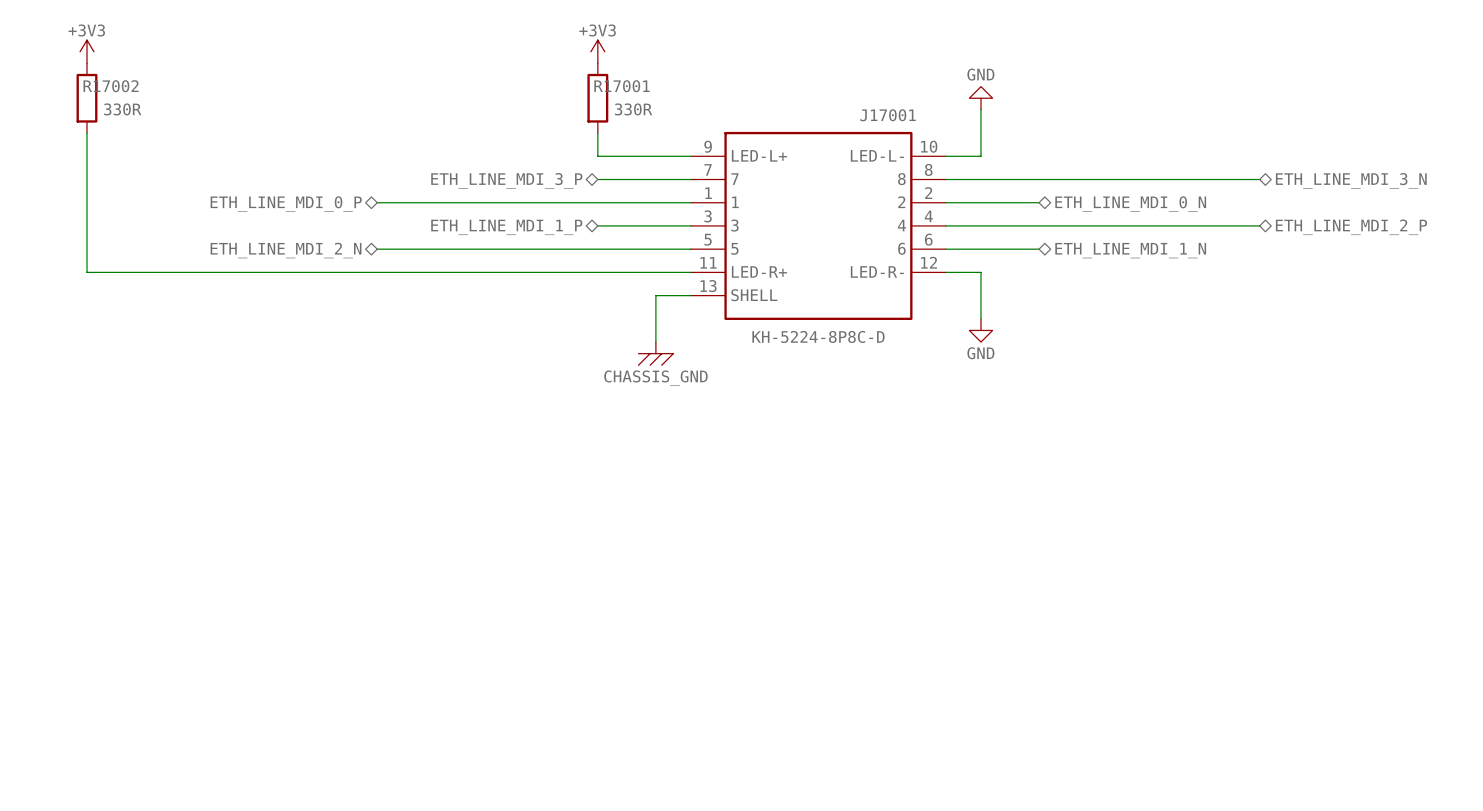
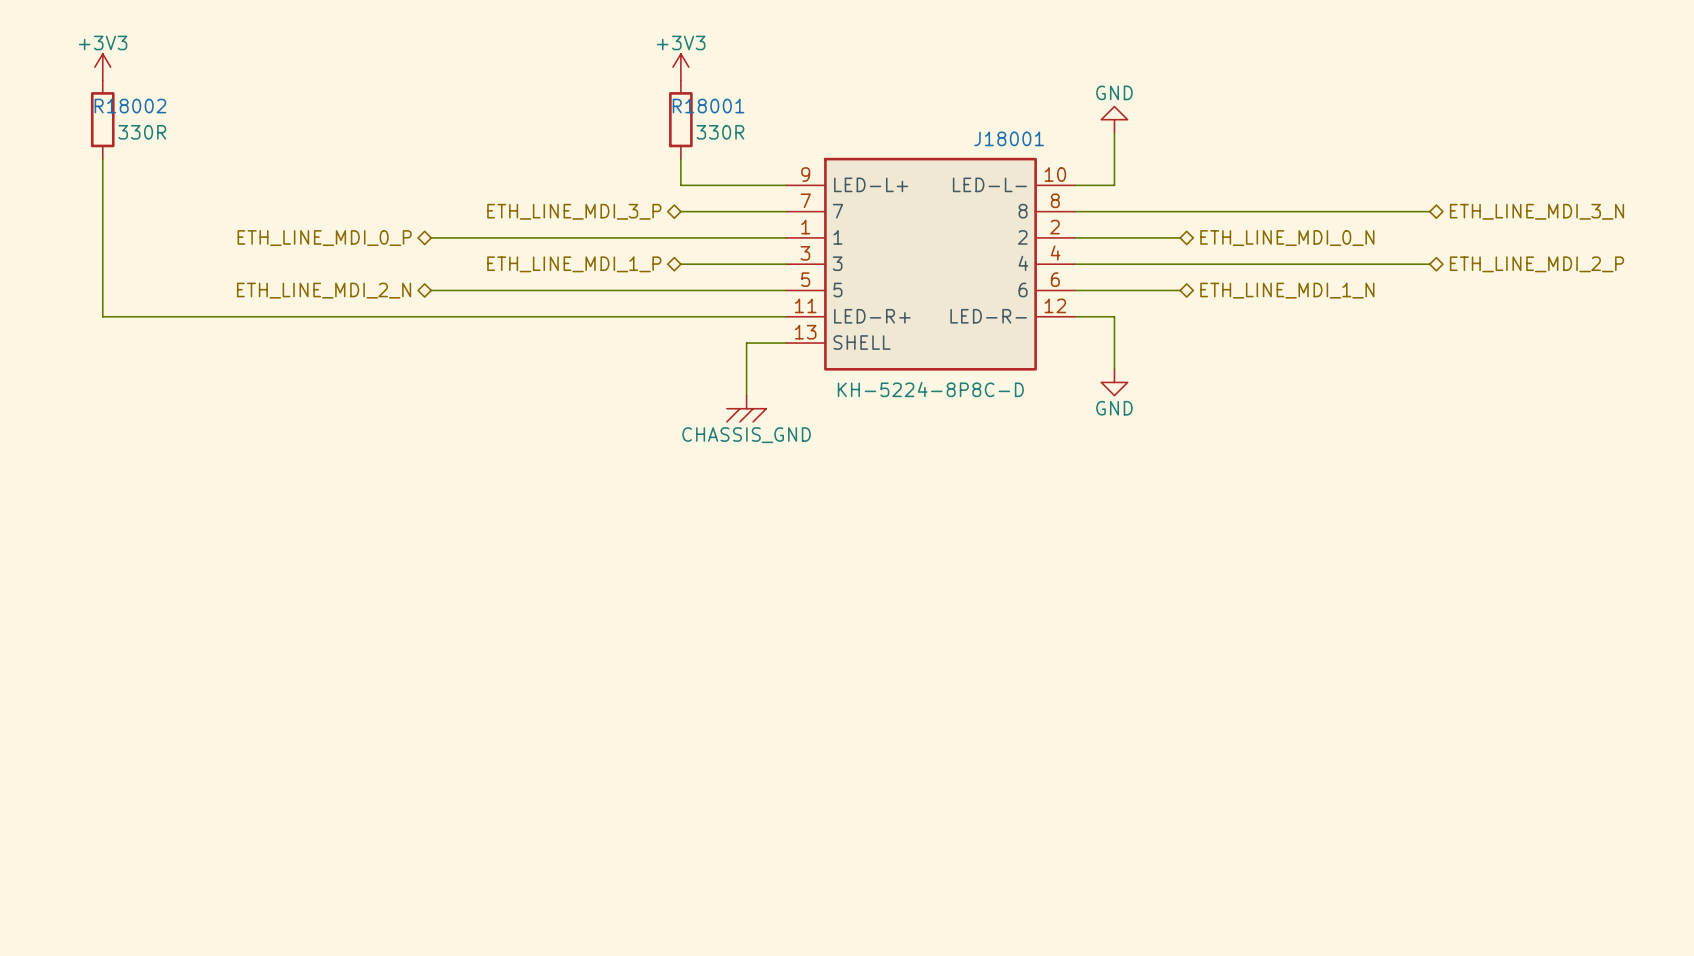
R17002 name: R17002 (111, 86) -> R18002 (130, 106)
R17001 name: R17001 (622, 86) -> R18001 (708, 106)
J17001 name: J17001 (887, 115) -> J18001 (1009, 138)

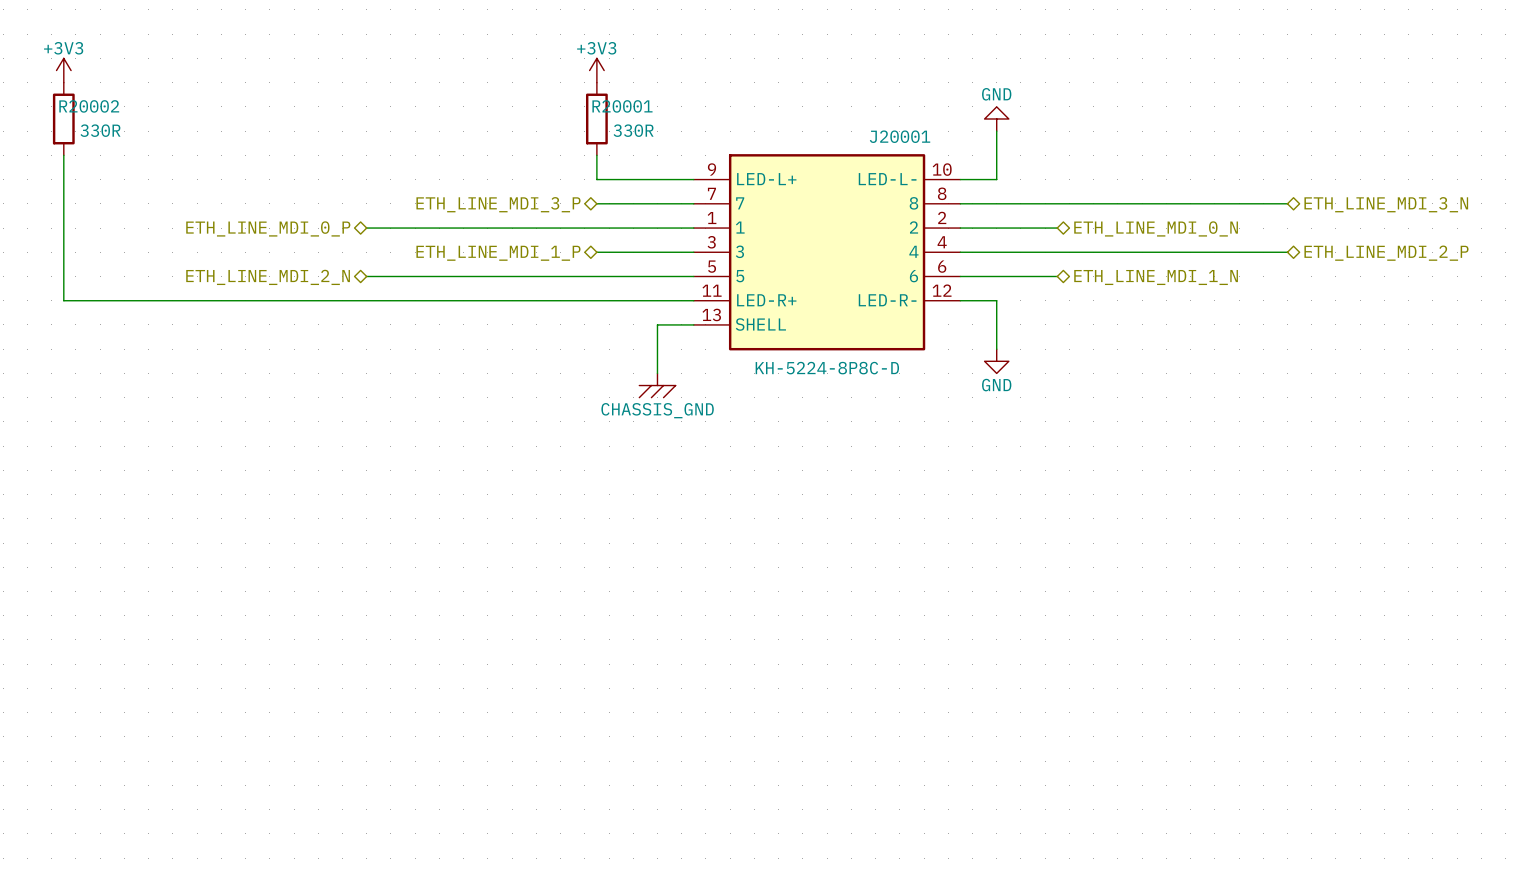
R18002 name: R18002 (130, 106) -> R20002 (89, 106)
R18001 name: R18001 (708, 106) -> R20001 (622, 106)
J18001 name: J18001 (1009, 138) -> J20001 (900, 136)

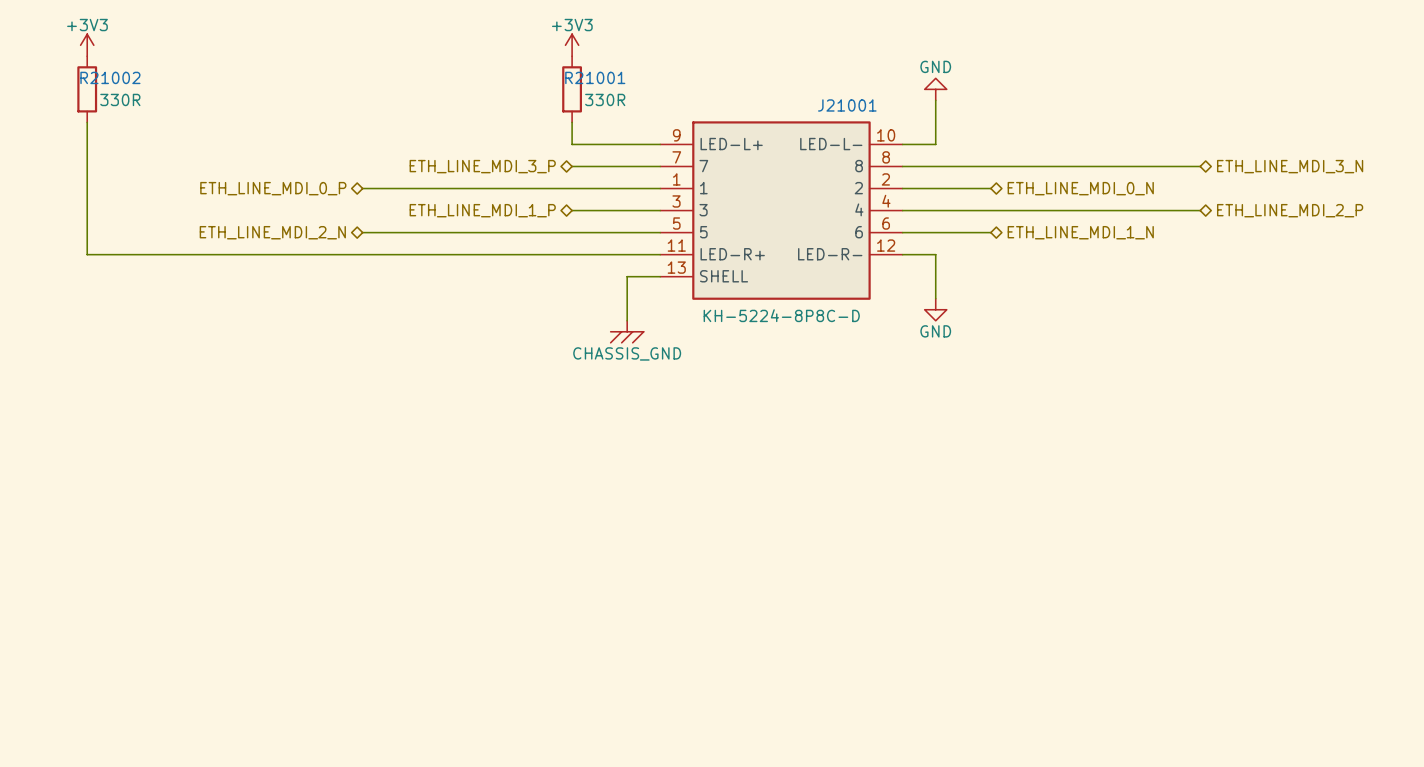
R20002 name: R20002 (89, 106) -> R21002 (110, 77)
R20001 name: R20001 (622, 106) -> R21001 (595, 77)
J20001 name: J20001 (900, 136) -> J21001 (847, 105)

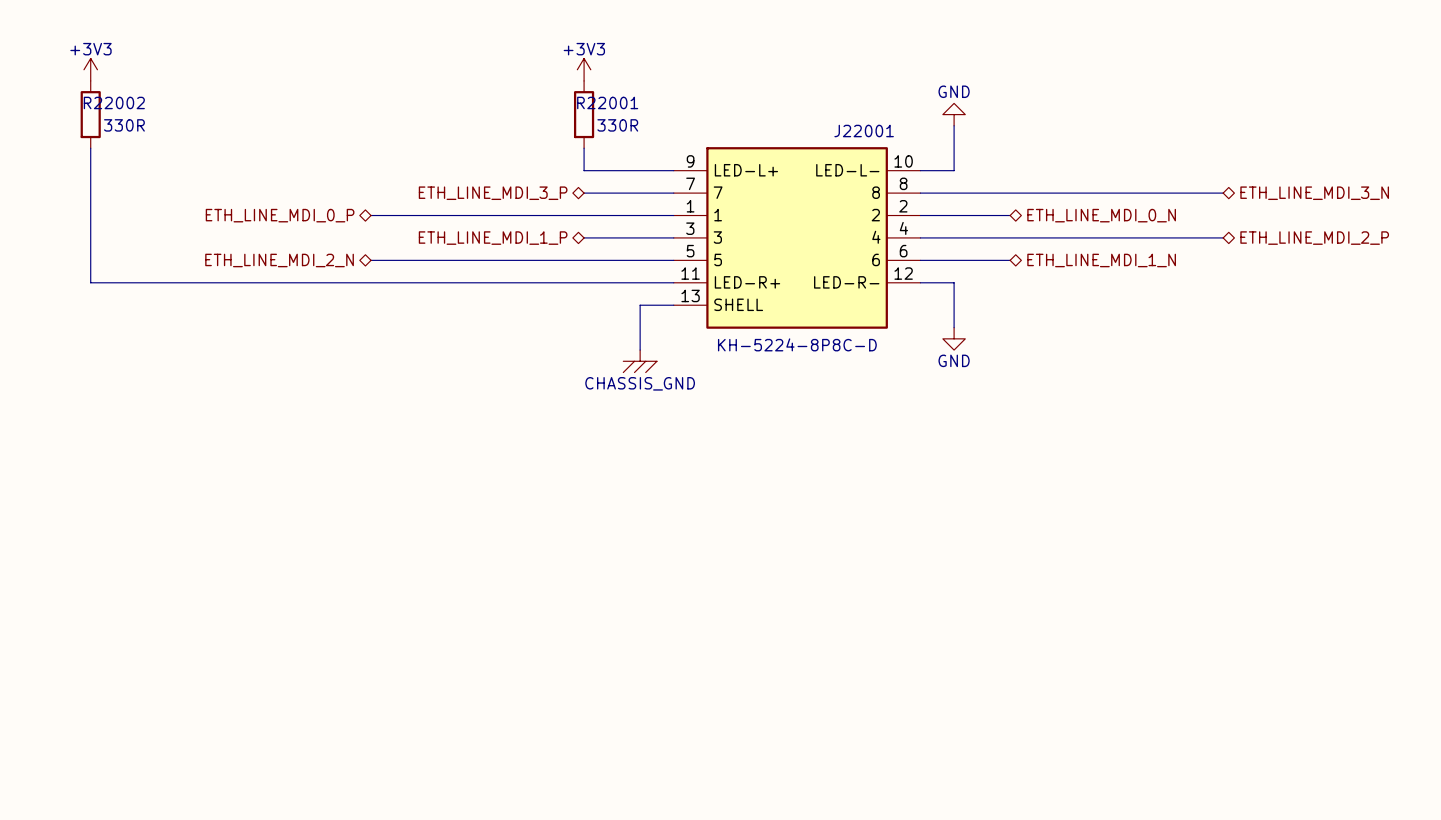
R21002 name: R21002 (110, 77) -> R22002 (114, 102)
R21001 name: R21001 (595, 77) -> R22001 (607, 102)
J21001 name: J21001 (847, 105) -> J22001 (864, 131)

